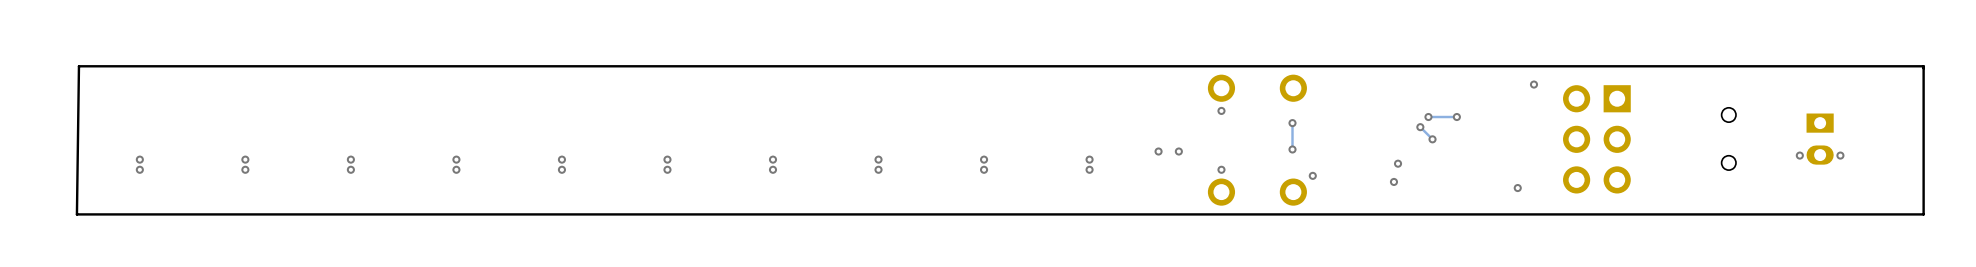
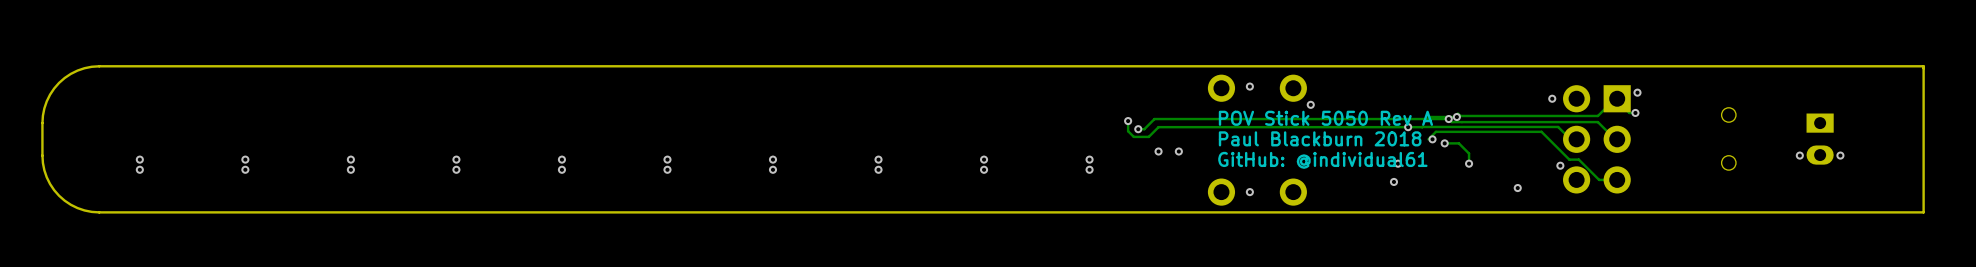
board edge: (99, 66) (78, 66) (76, 214) (1923, 214) (1923, 212) -> (99, 66) (77, 70) (59, 82) (46, 101) (42, 123) (42, 162) (50, 183) (64, 200) (77, 208) (91, 211) (1923, 212)
via position: (1533, 84) -> (1552, 98)
via: none -> (1249, 86)
via: none -> (1637, 92)
via: none -> (1310, 104)
via: (1221, 110) -> none
track: none -> (1635, 112) (1629, 112) (1615, 98) (1597, 115) (1460, 115) (1457, 113)
via: none -> (1635, 112)
via: (1428, 117) -> none
text: none -> POV Stick 5050 Rev A (1325, 118)
via: none -> (1448, 119)
track: none -> (1128, 121) (1128, 131) (1133, 136) (1148, 136) (1158, 127) (1422, 127)
via: none -> (1128, 121)
track: (1292, 123) (1292, 149) -> none
via: (1292, 123) -> none
track: none -> (1421, 126) (1558, 126) (1570, 139) (1574, 139)
via: none -> (1408, 127)
track: (1420, 127) (1432, 139) -> none
via: (1420, 127) -> none
track: none -> (1138, 129) (1144, 129) (1154, 119) (1448, 119) (1451, 122) (1597, 122) (1615, 139)
via: none -> (1138, 129)
text: none -> Paul Blackburn 2018 (1320, 138)
track: none -> (1428, 139) (1435, 131) (1541, 131) (1569, 159) (1578, 159) (1599, 179) (1615, 179)
track: none -> (1444, 143) (1458, 143) (1469, 153) (1469, 163)
via: none -> (1444, 143)
via: (1292, 149) -> none
text: none -> GitHub: @individual61 (1322, 160)
via: none -> (1469, 163)
via: none -> (1560, 165)
via: (1221, 169) -> none
via: (1312, 175) -> none
via: none -> (1249, 192)

